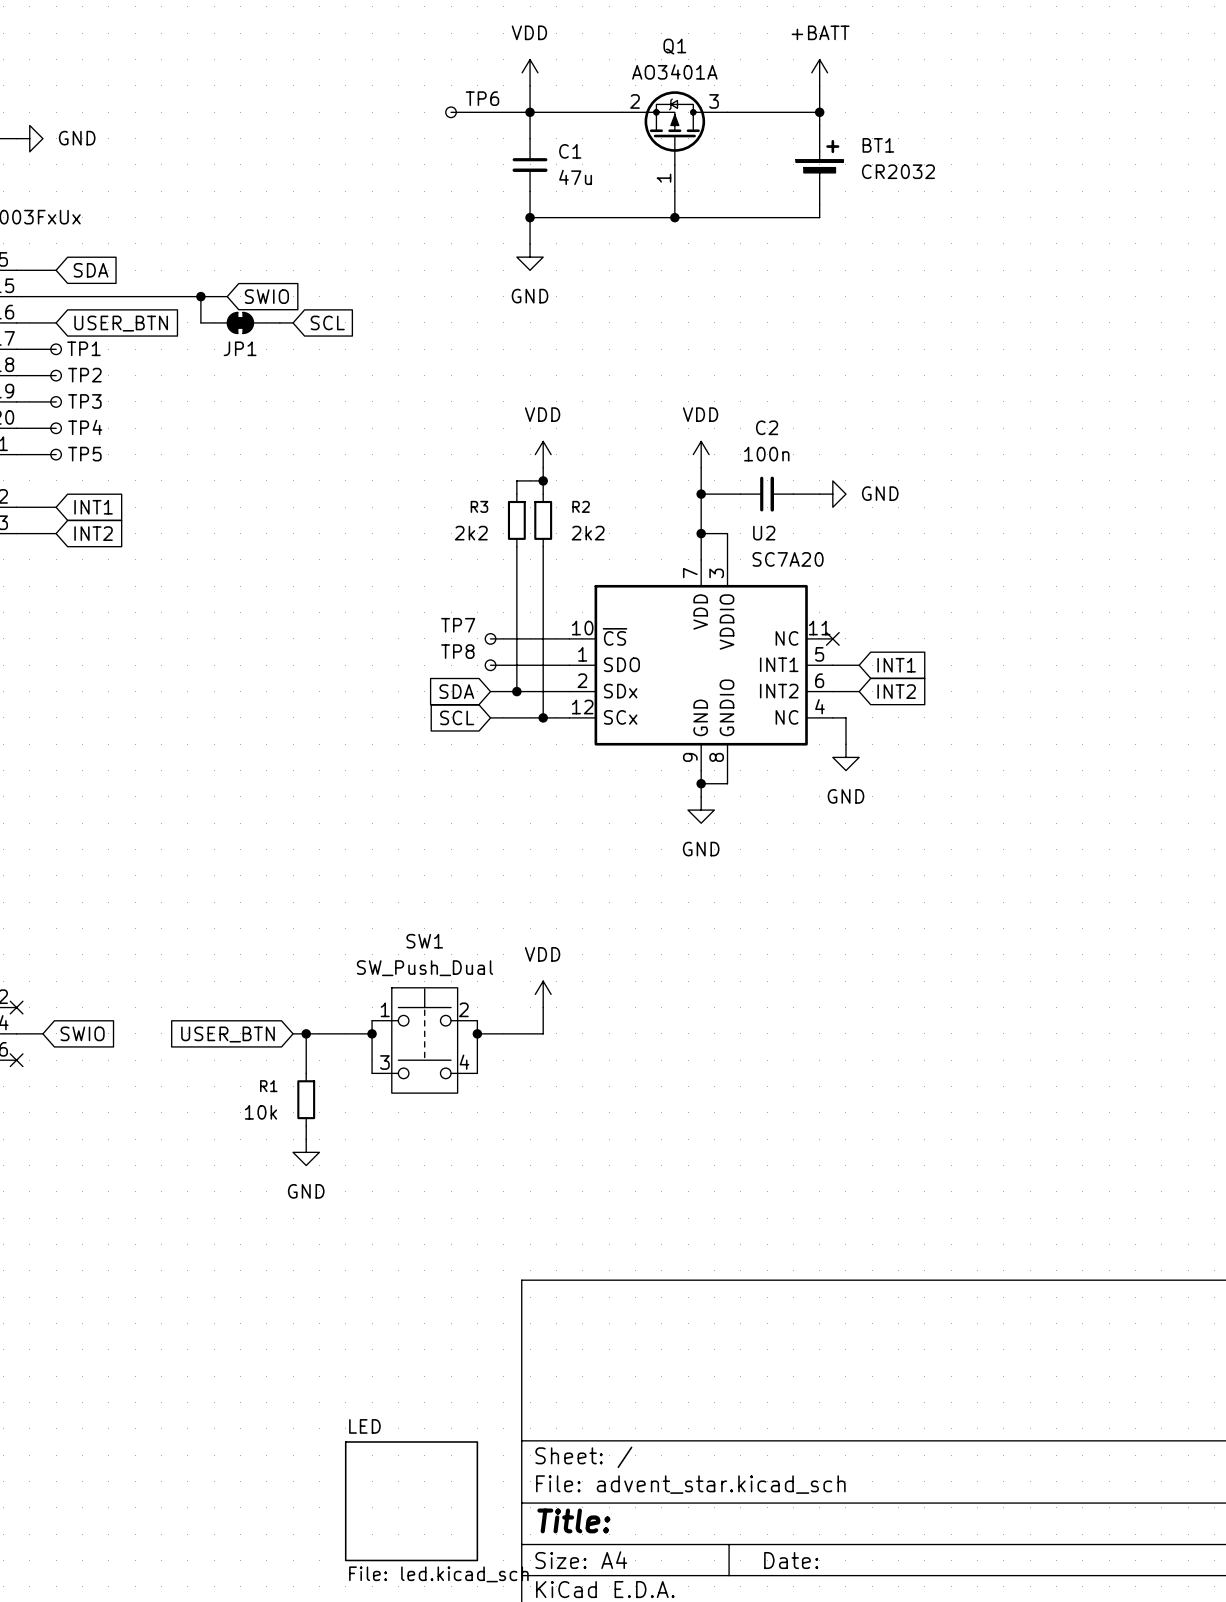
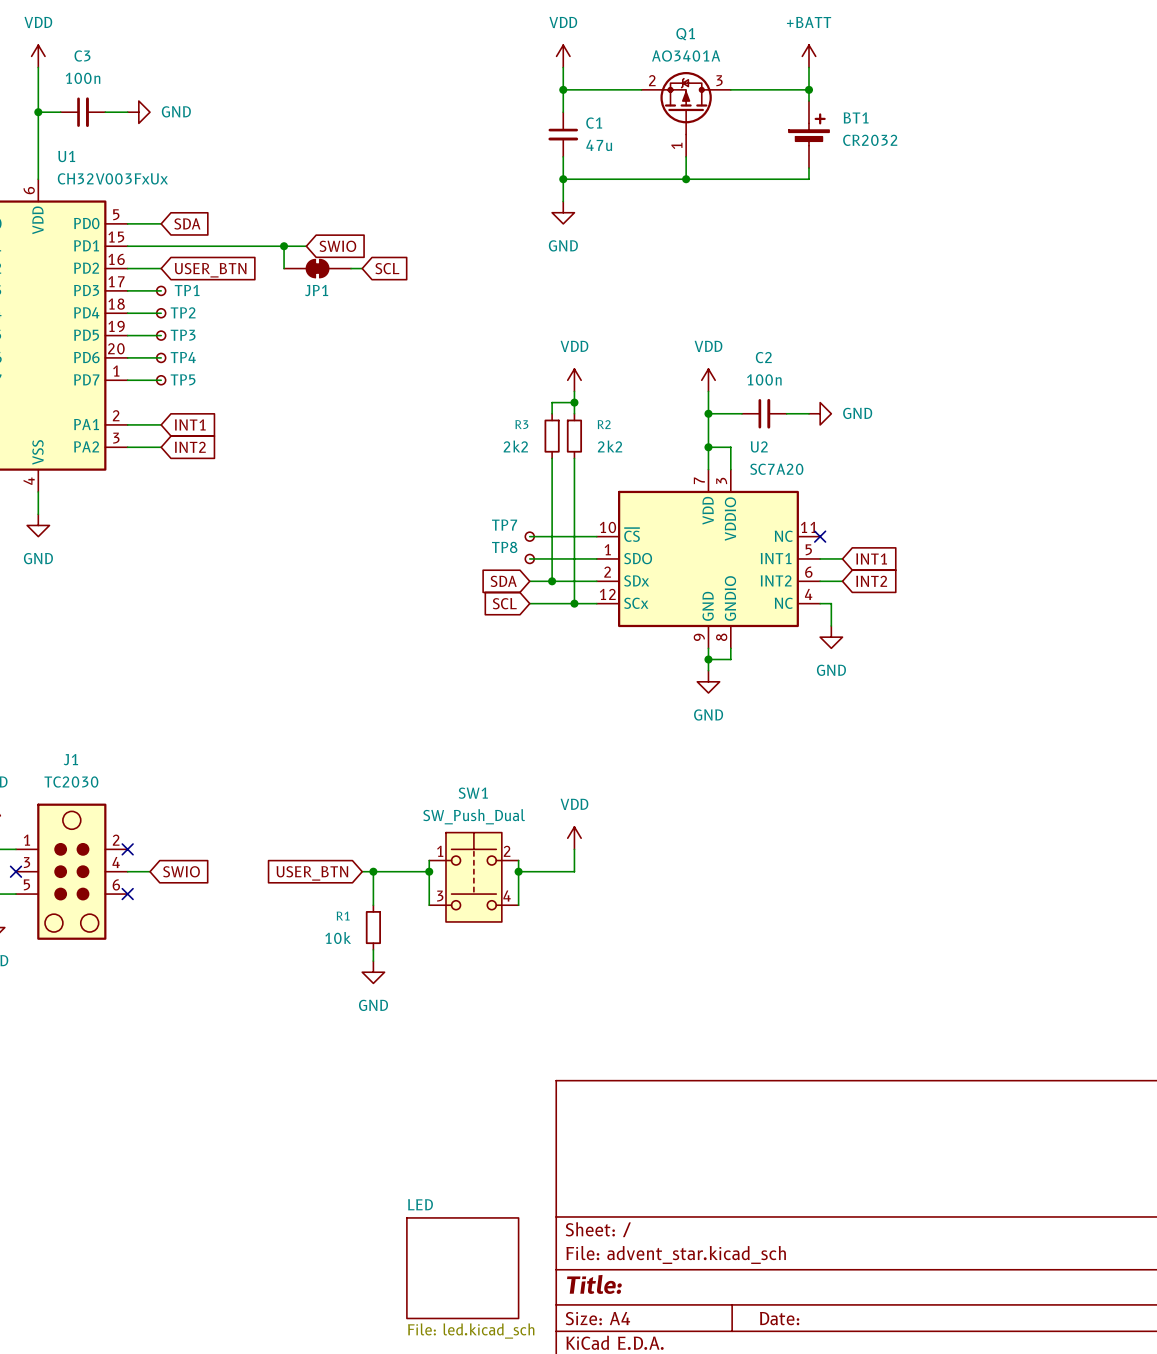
wire: (451, 112) (530, 112) -> none
TP6: (451, 112) -> none

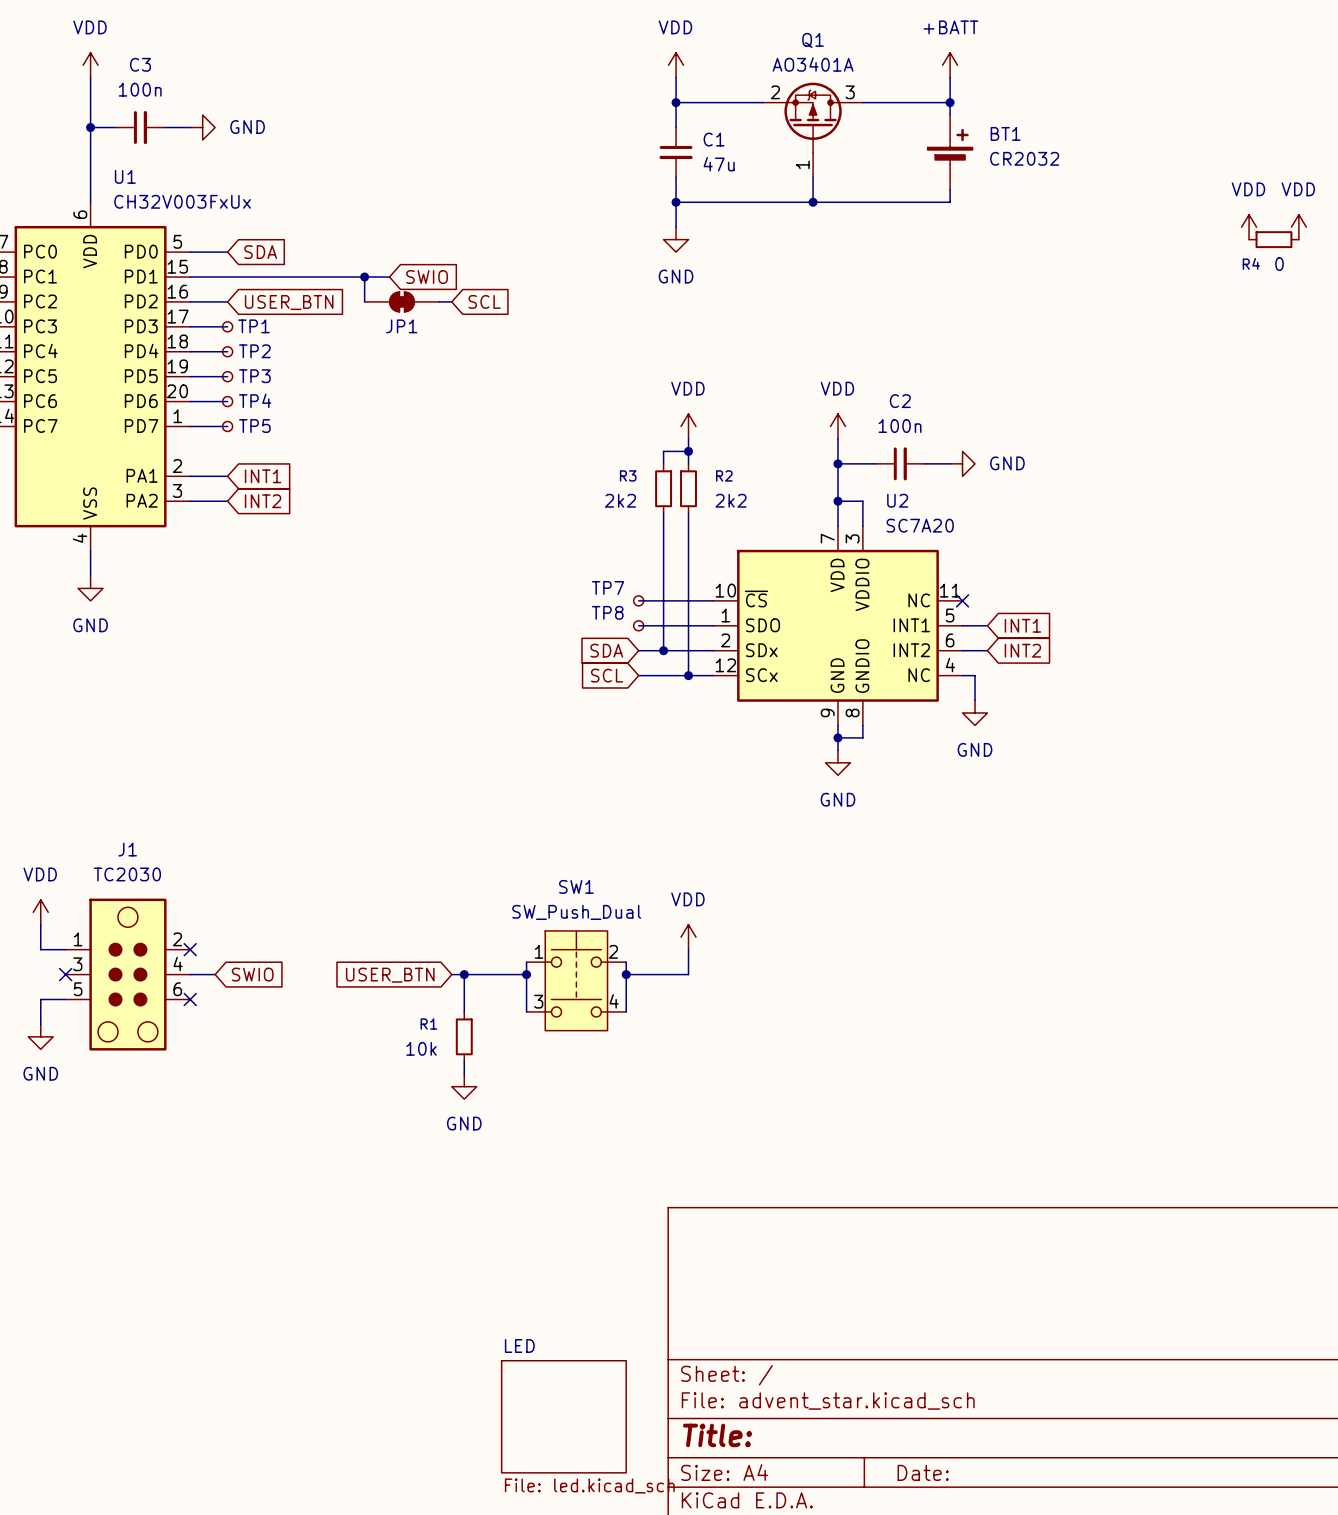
power symbol: none -> VDD (1249, 227)
power symbol: none -> VDD (1298, 227)
R4: none -> 0 (1273, 239)

